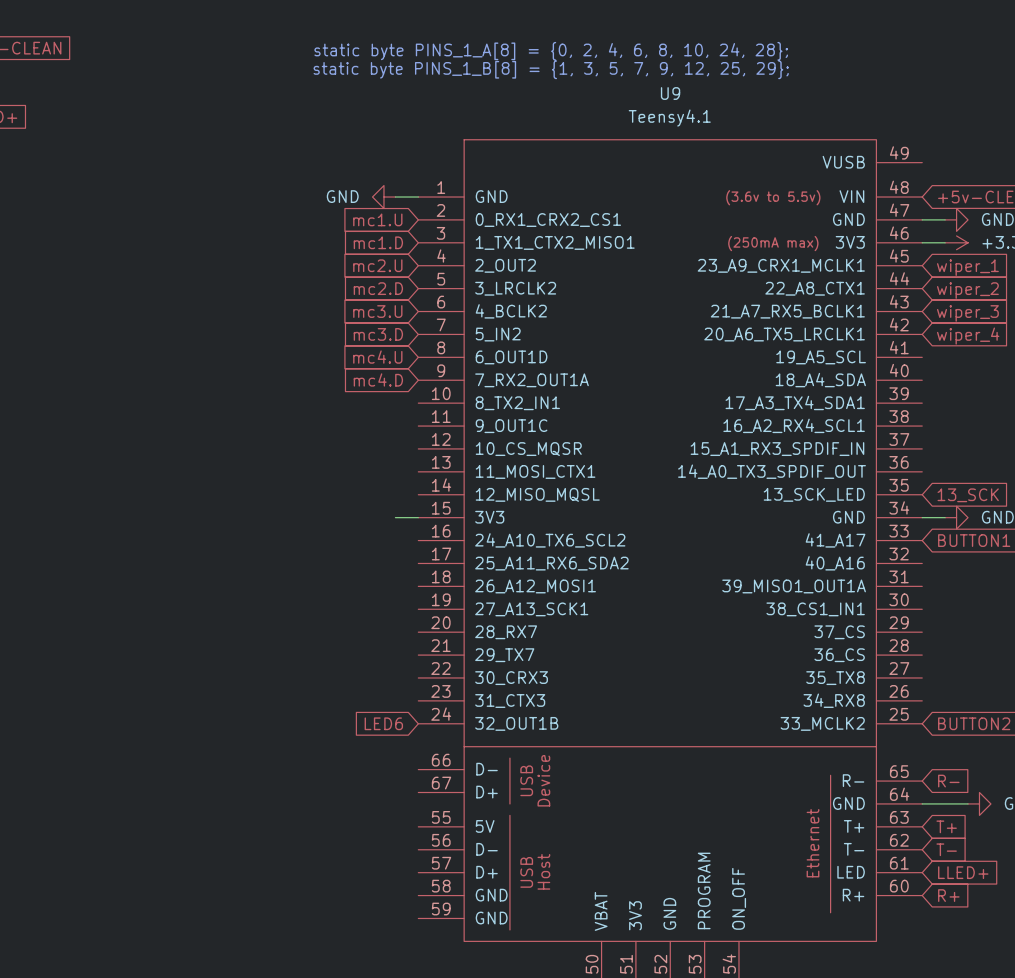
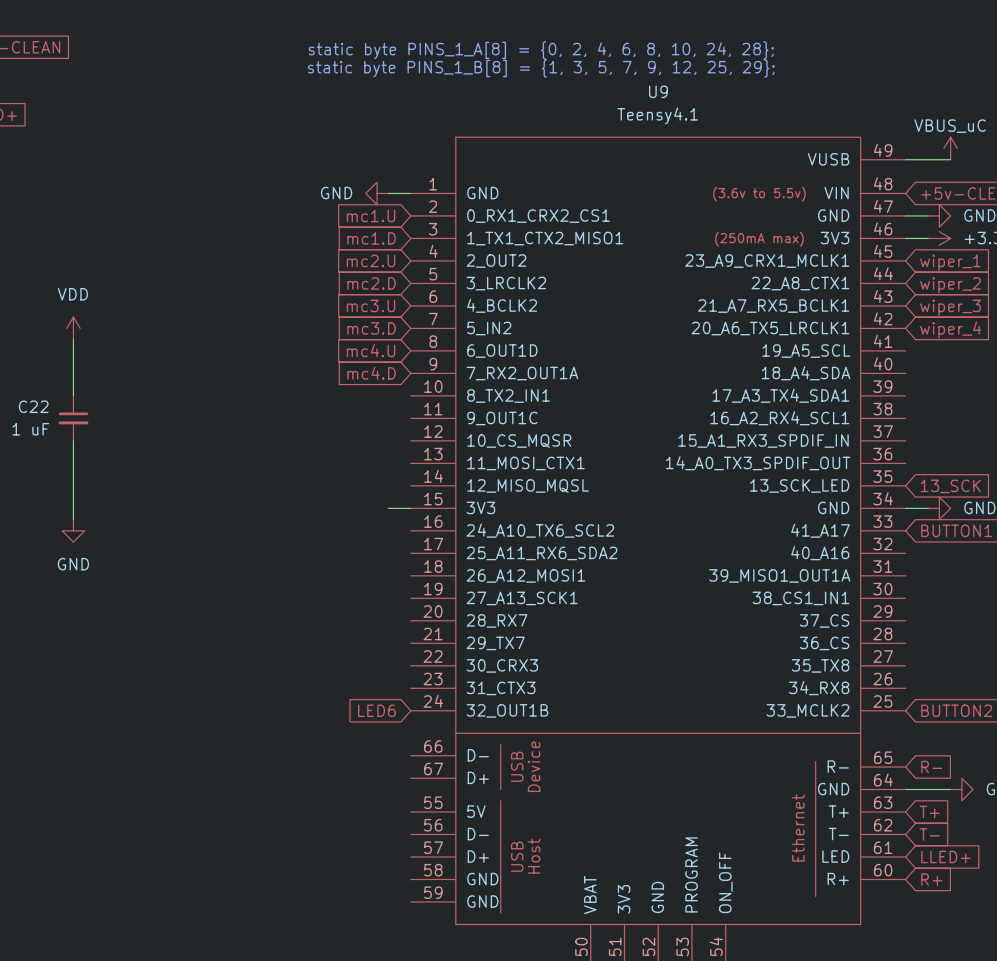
power symbol: none -> VBUS_uC (950, 148)
wire: none -> (905, 159) (950, 159)
power symbol: none -> VDD (73, 328)
wire: none -> (73, 339) (73, 395)
C22: none -> 1 uF (73, 418)
wire: none -> (73, 440) (73, 519)
power symbol: none -> GND (73, 530)

